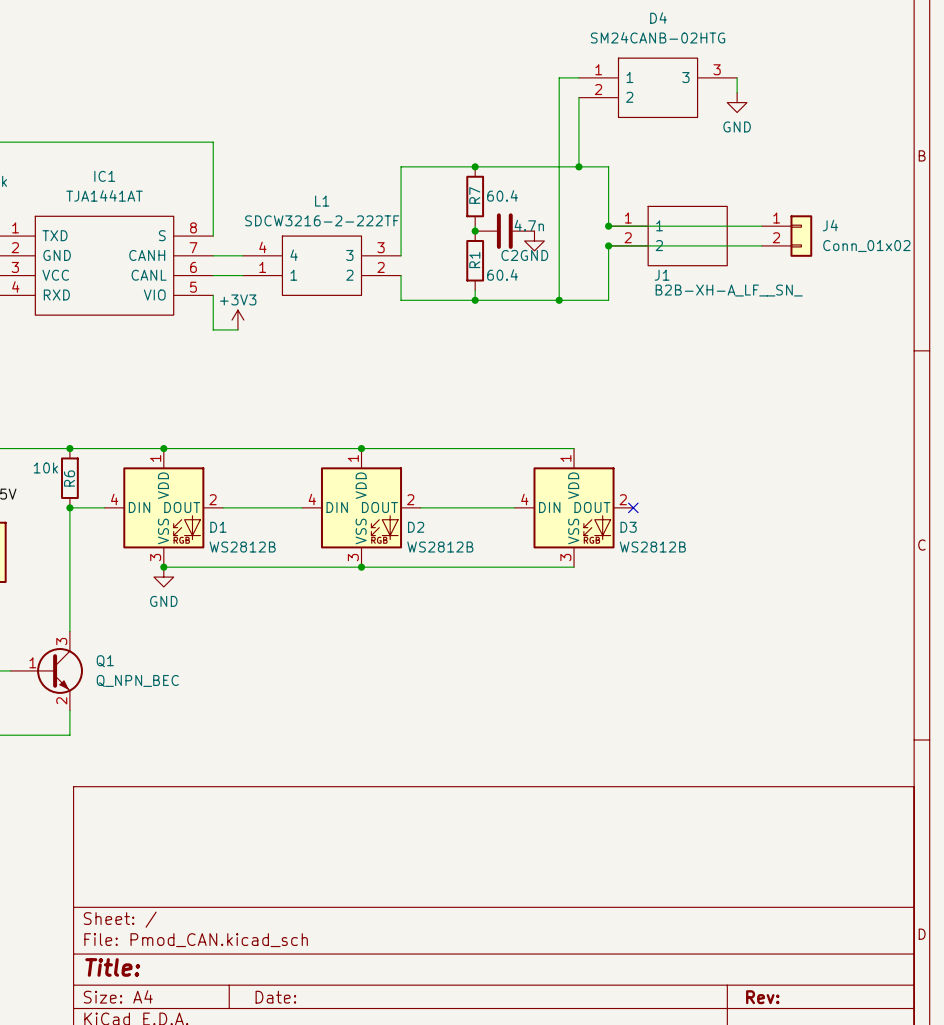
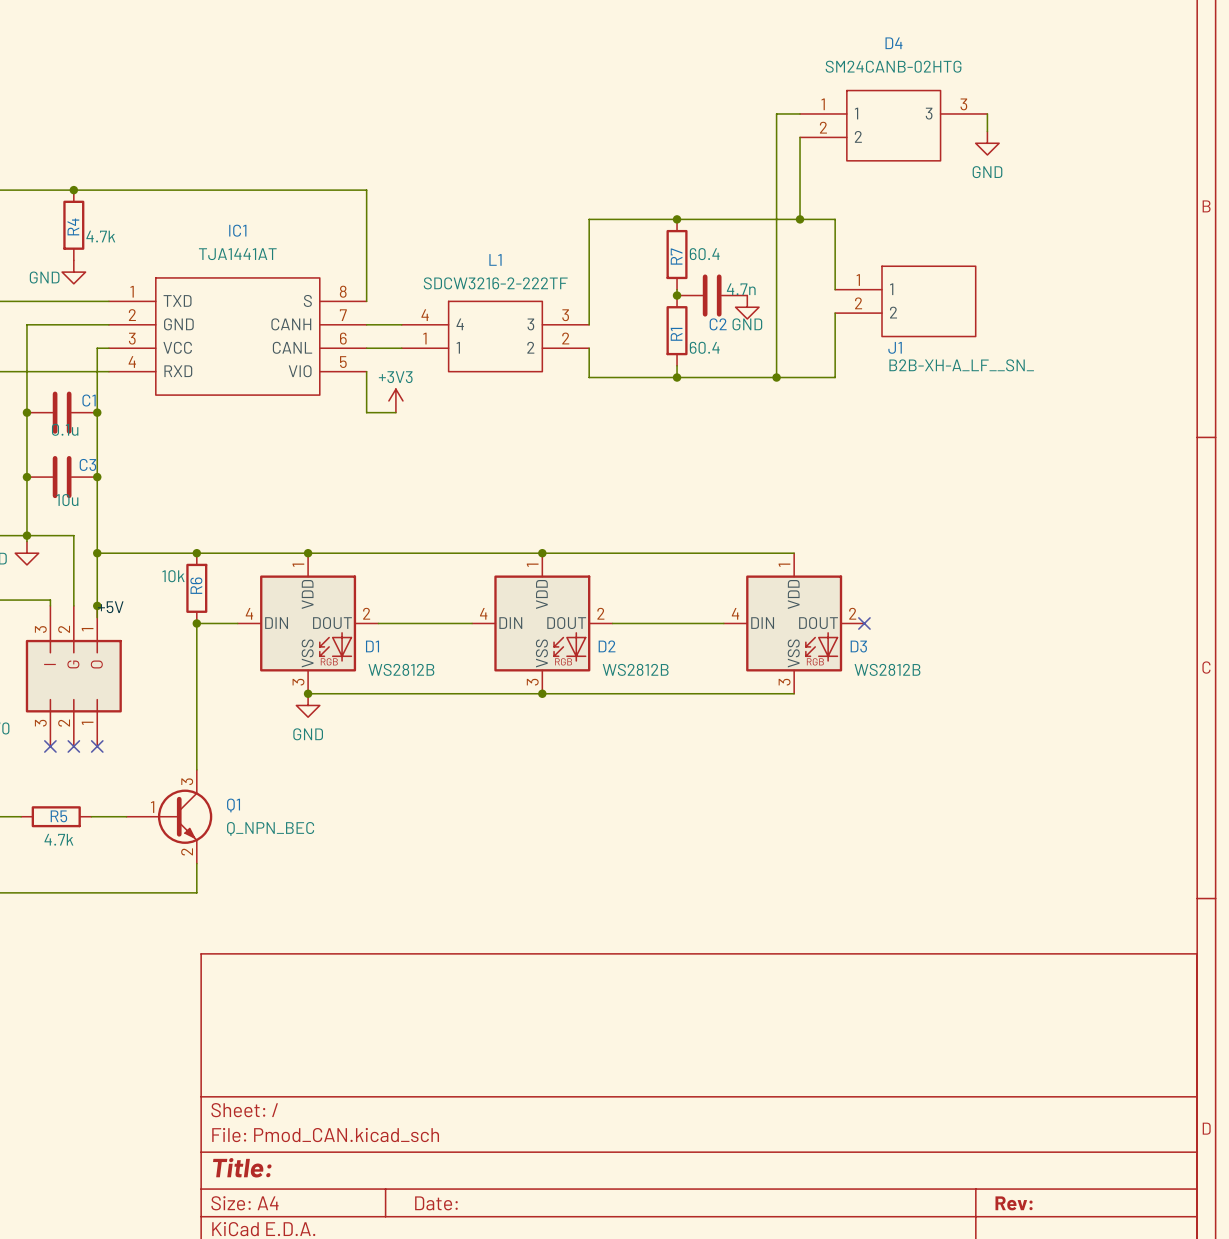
wire: (608, 226) (761, 226) -> none
junction: (608, 226) -> none
J4: Conn_01x02 (787, 236) -> none
wire: (608, 245) (761, 245) -> none
junction: (608, 245) -> none

